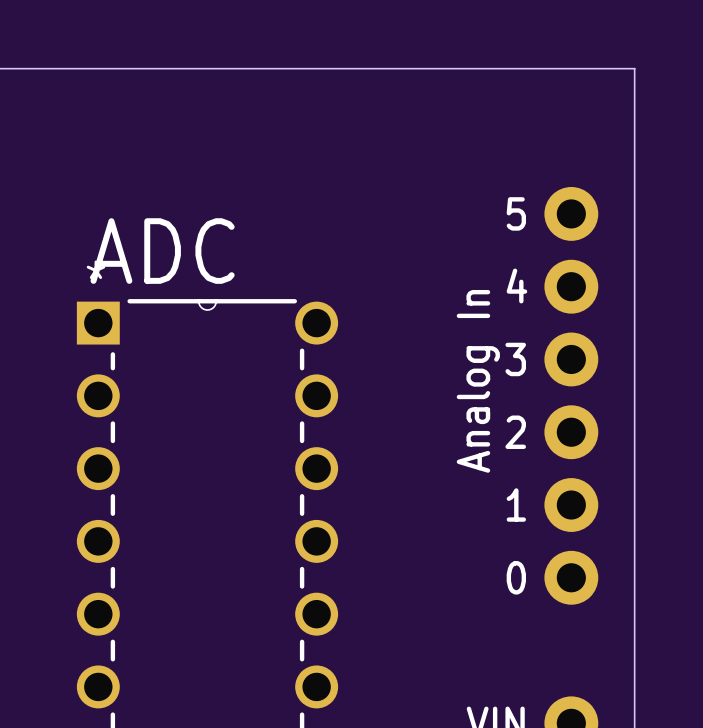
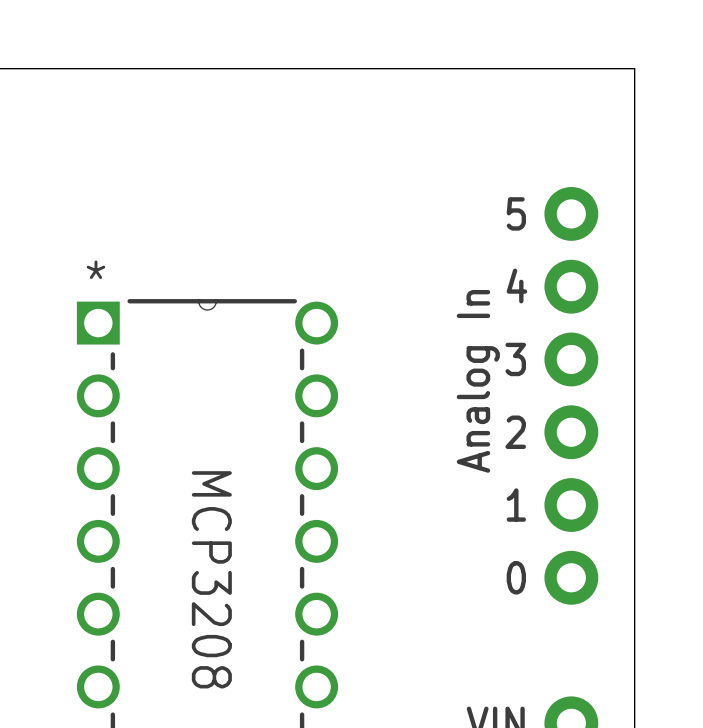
ADC name: ADC (162, 251) -> MCP3208 (211, 579)

